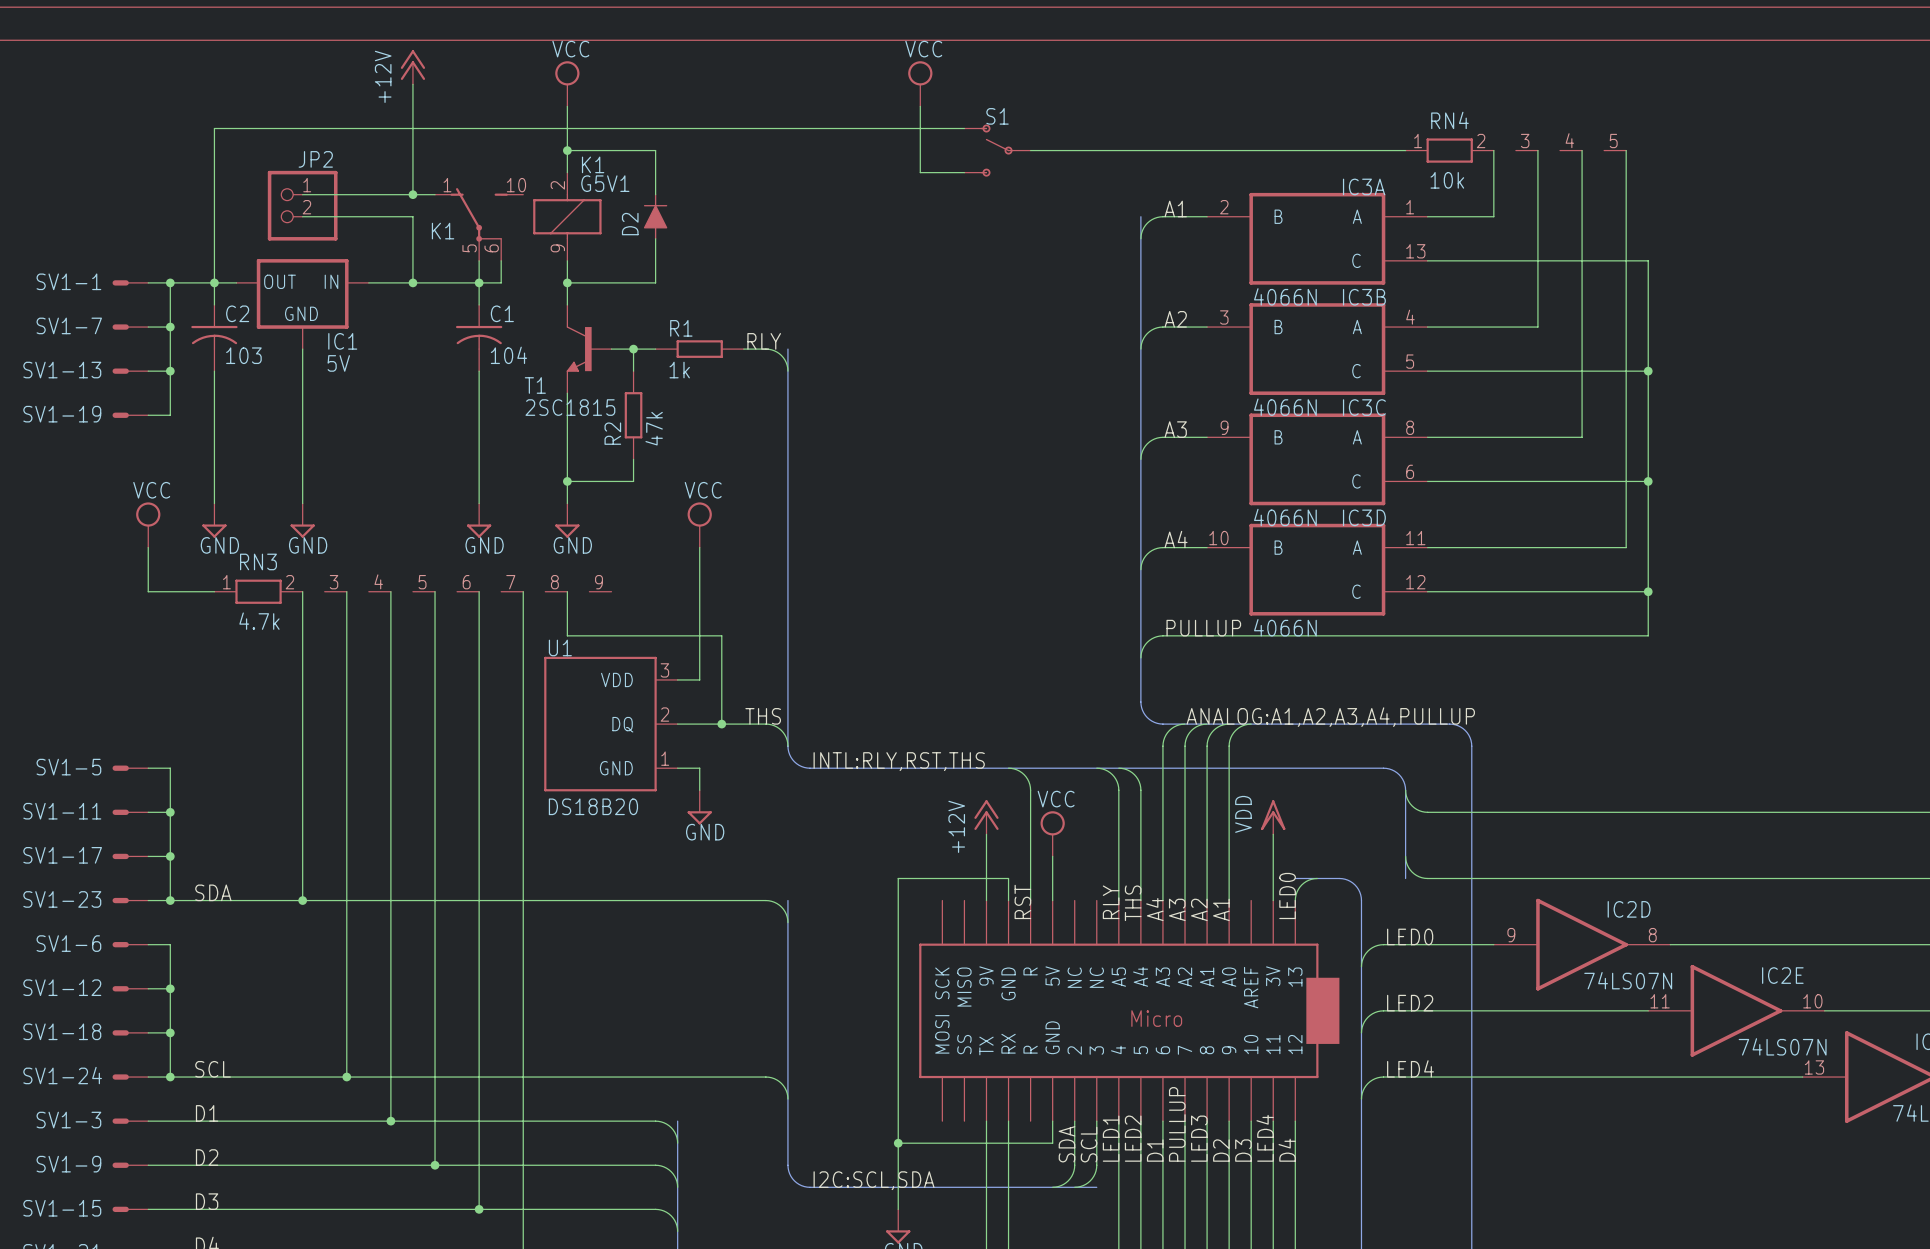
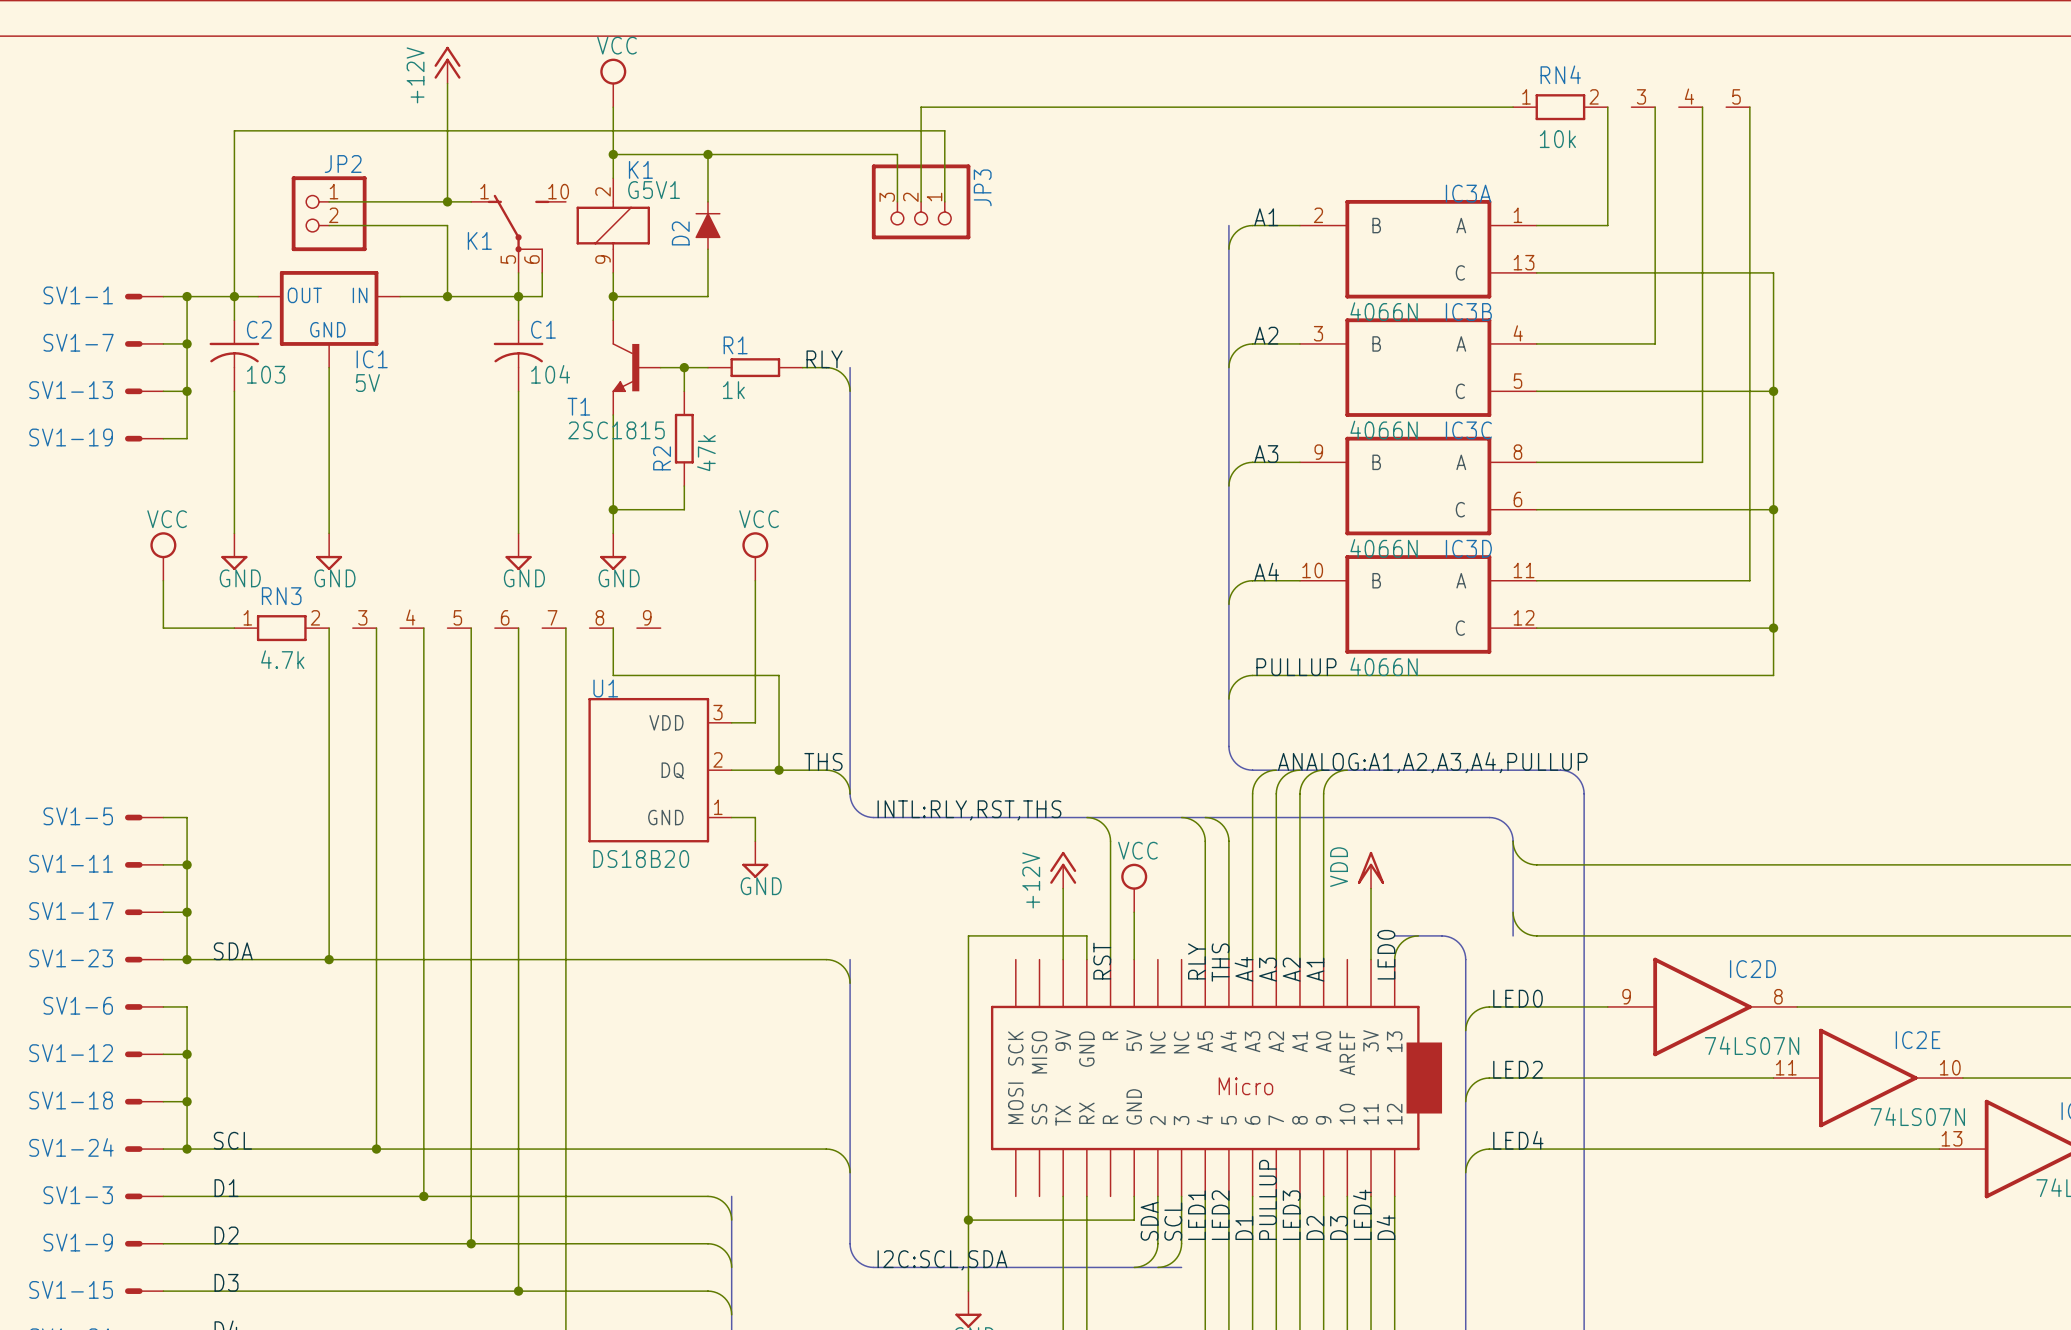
power symbol: VCC (920, 83) -> none
wire: (920, 106) (920, 172) (964, 172) -> none
wire: none -> (1513, 107) (921, 107) (921, 201)
wire: none -> (1607, 107) (1607, 154)
wire: none -> (1655, 107) (1655, 154)
wire: none -> (1702, 107) (1702, 154)
wire: none -> (1749, 107) (1749, 154)
wire: (876, 128) (964, 128) -> (944, 130) (944, 201)
wire: none -> (707, 154) (897, 154) (897, 201)
junction: none -> (707, 154)
S1: (997, 150) -> none
wire: (1030, 150) (1405, 150) -> none
RN4 position: (1515, 150) -> (1631, 107)
JP3: none -> (921, 201)

